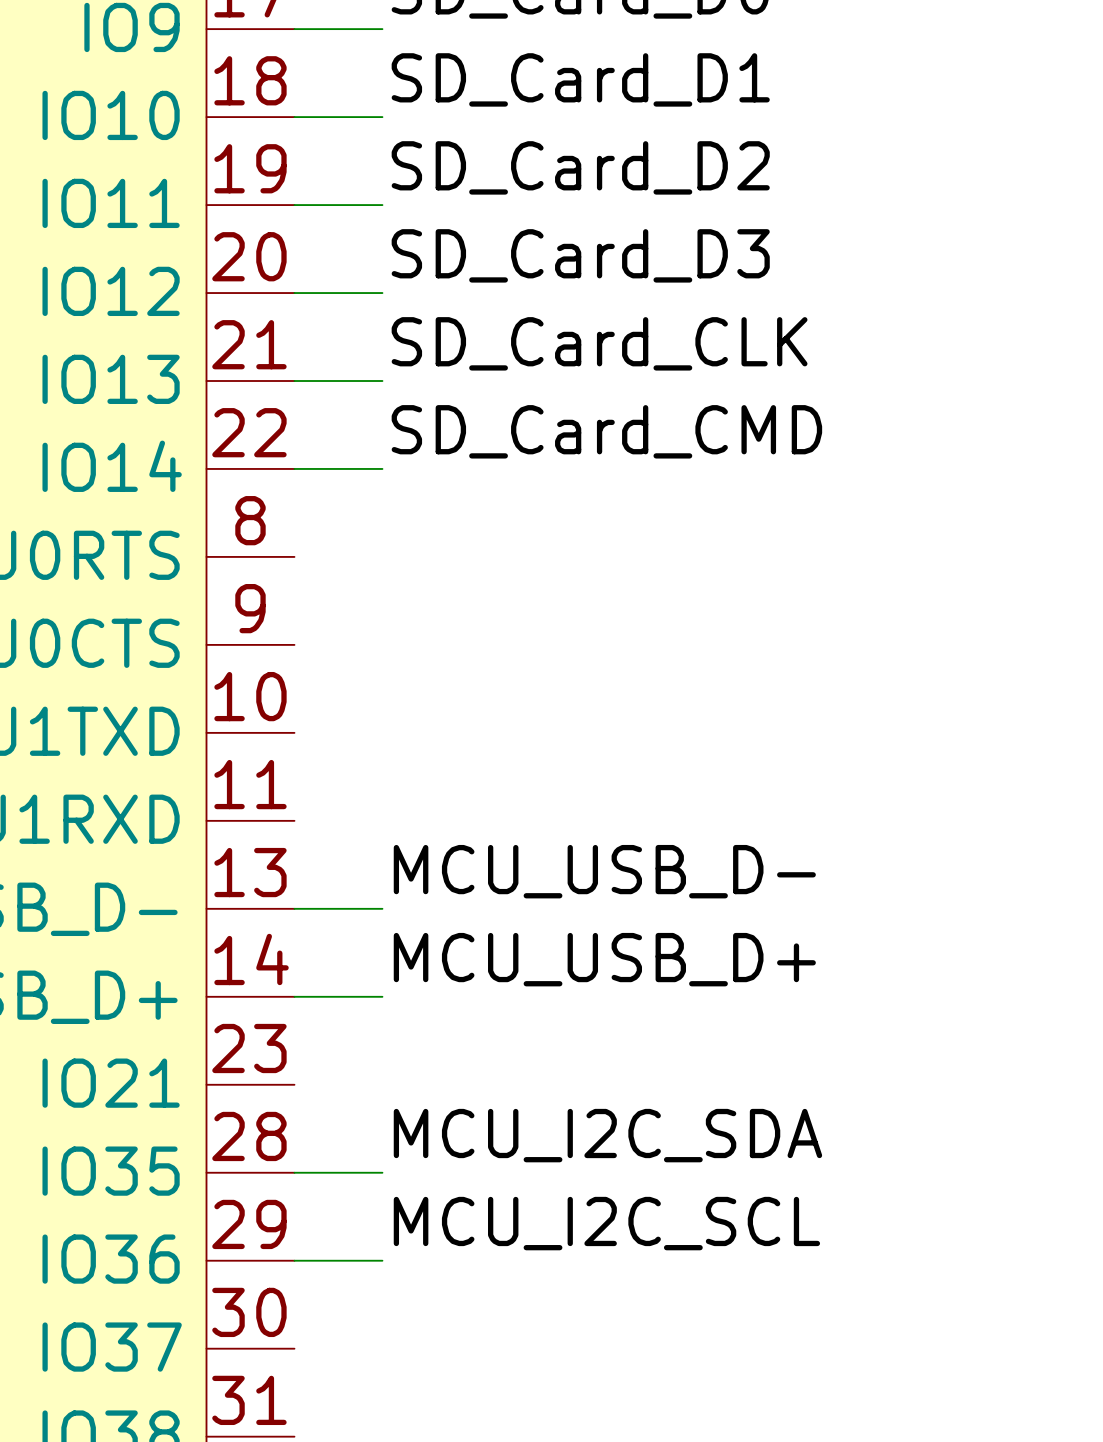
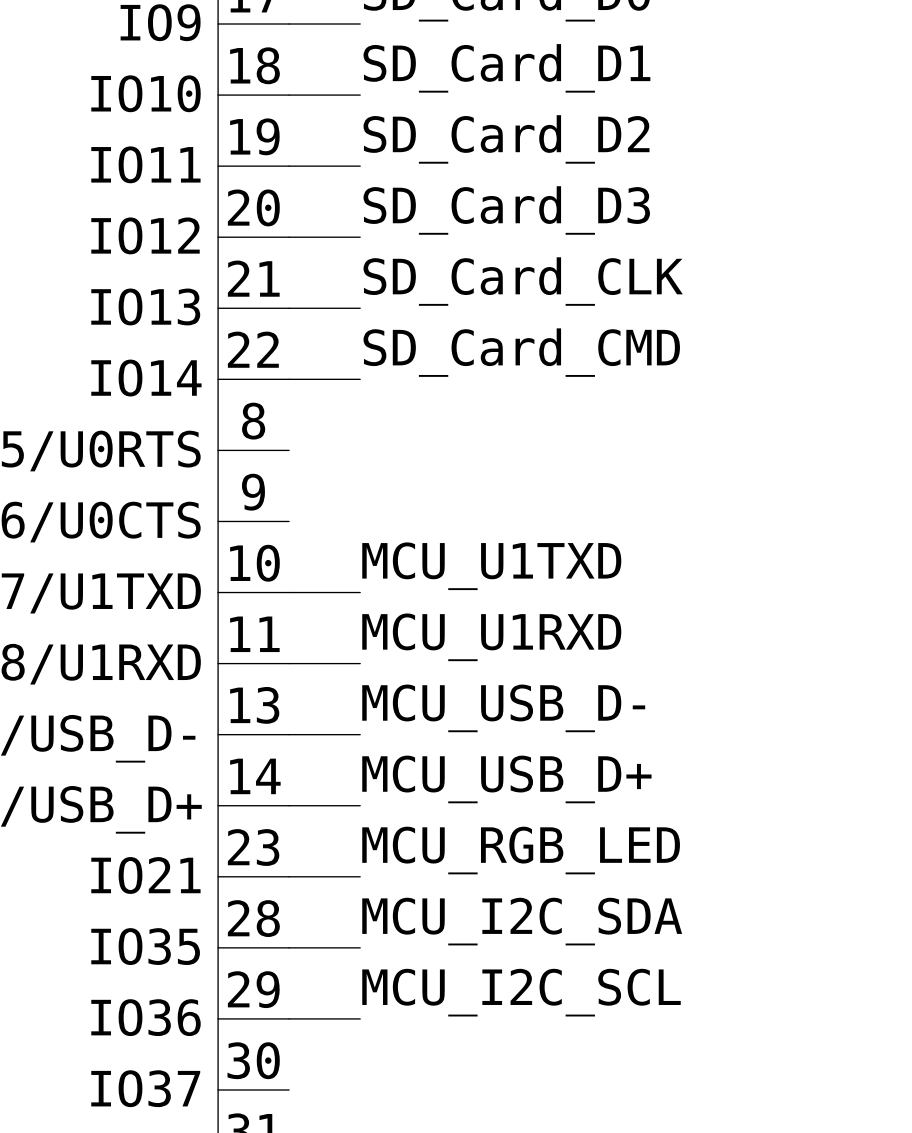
label: none -> MCU_U1TXD (491, 566)
wire: none -> (289, 592) (360, 592)
label: none -> MCU_U1RXD (491, 637)
wire: none -> (289, 663) (360, 663)
label: none -> MCU_RGB_LED (521, 850)
wire: none -> (289, 876) (360, 876)

